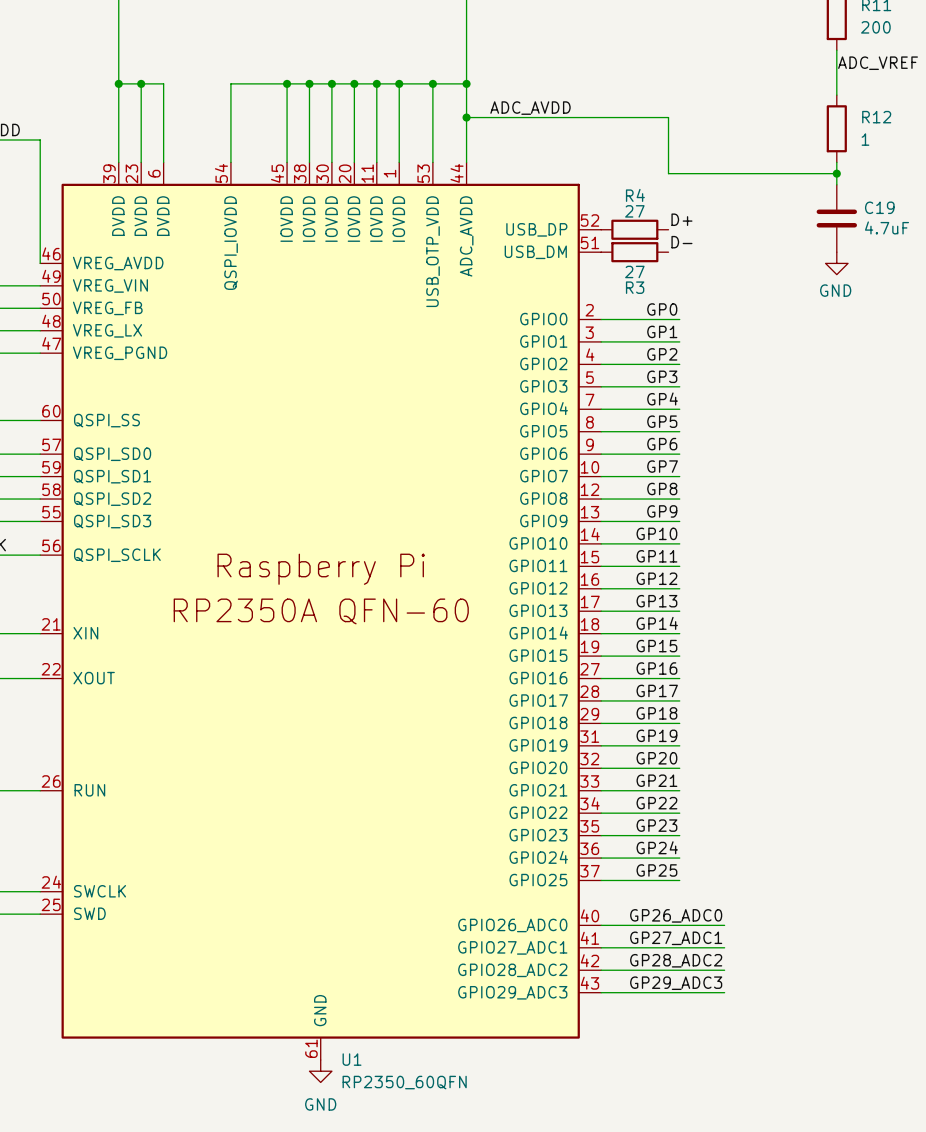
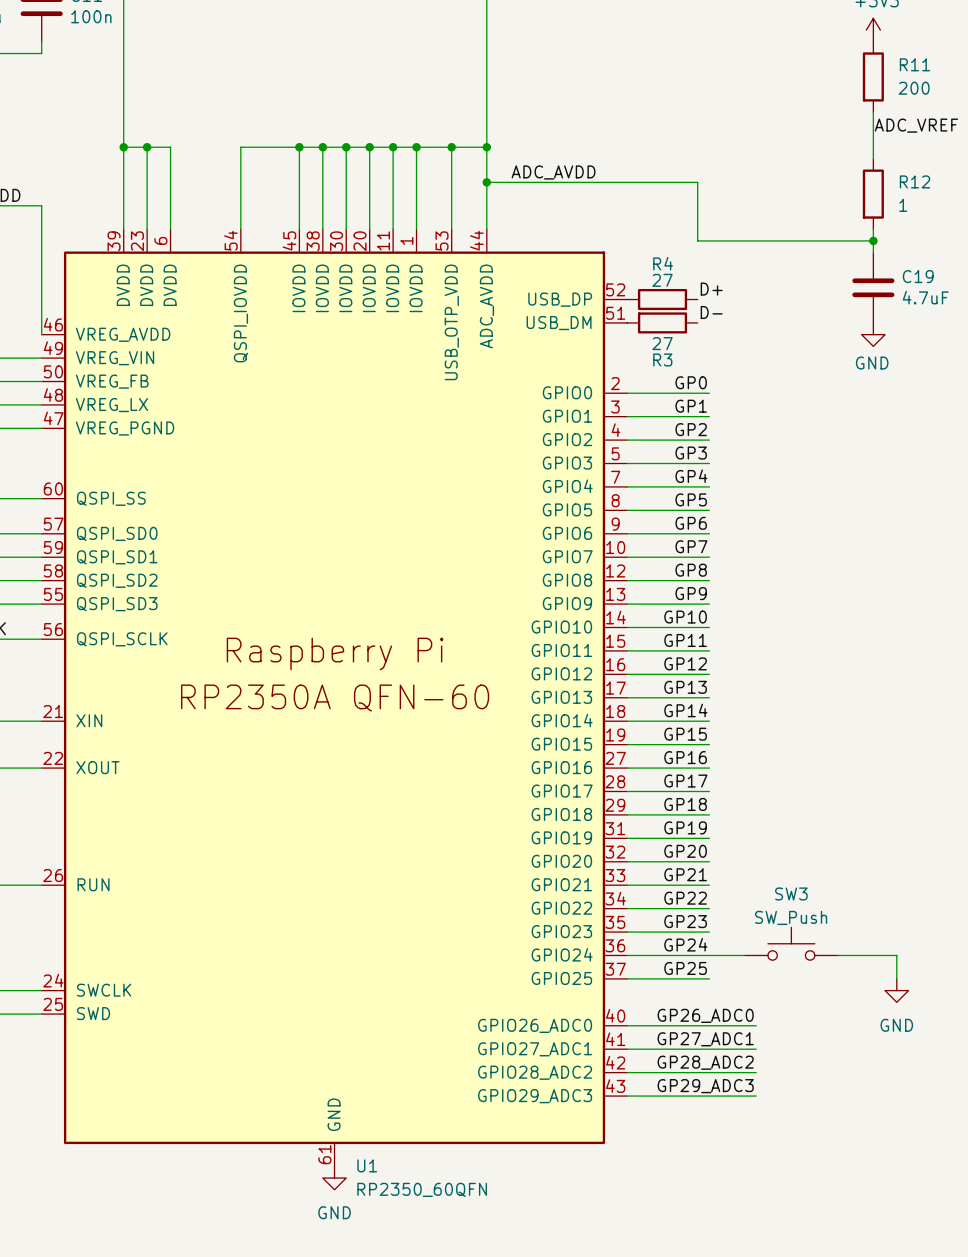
SW3: none -> SW_Push (791, 943)
wire: none -> (709, 955) (744, 955)
wire: none -> (838, 955) (896, 955) (896, 978)
power symbol: none -> GND (896, 990)

